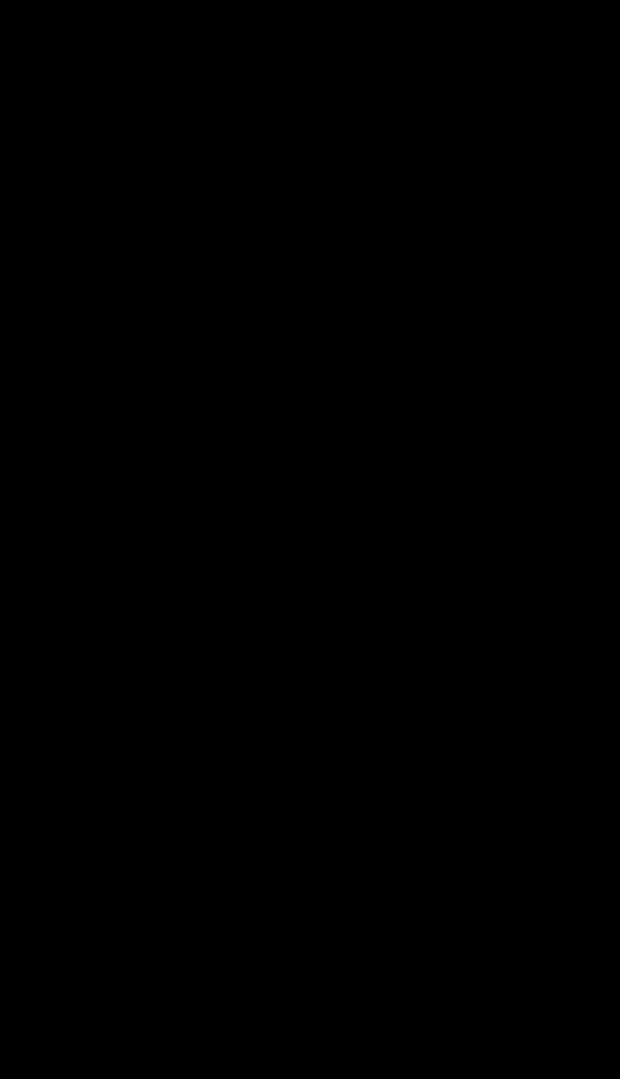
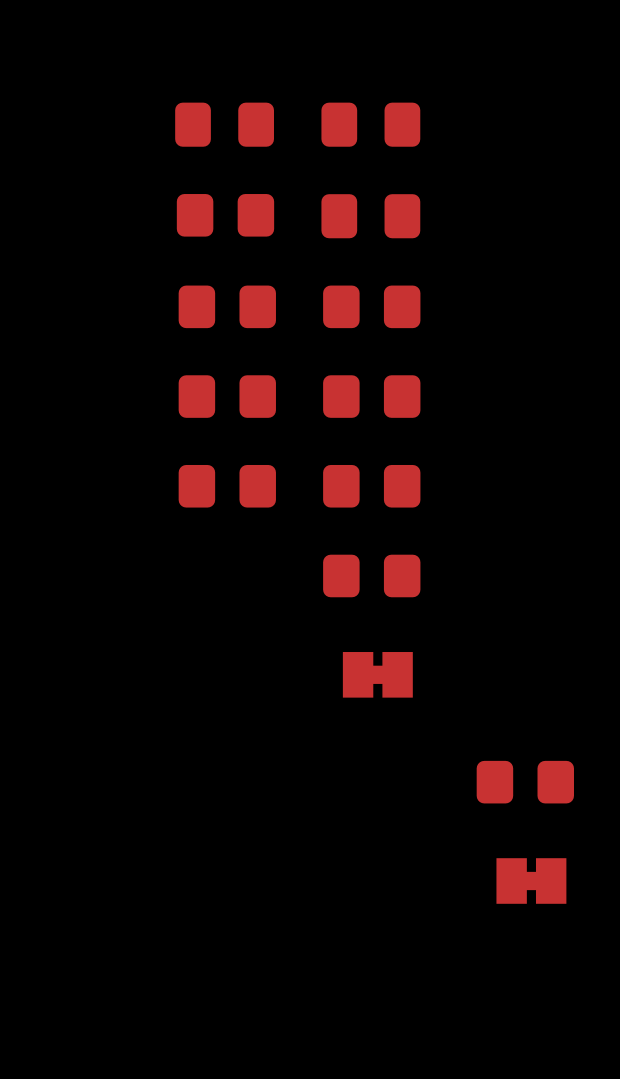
part: none -> (224, 124)
part: none -> (370, 124)
part: none -> (225, 215)
part: none -> (370, 216)
part: none -> (227, 306)
part: none -> (371, 306)
part: none -> (227, 396)
part: none -> (371, 396)
part: none -> (227, 486)
part: none -> (371, 486)
part: none -> (371, 575)
part: none -> (377, 674)
part: none -> (525, 782)
part: none -> (531, 881)

